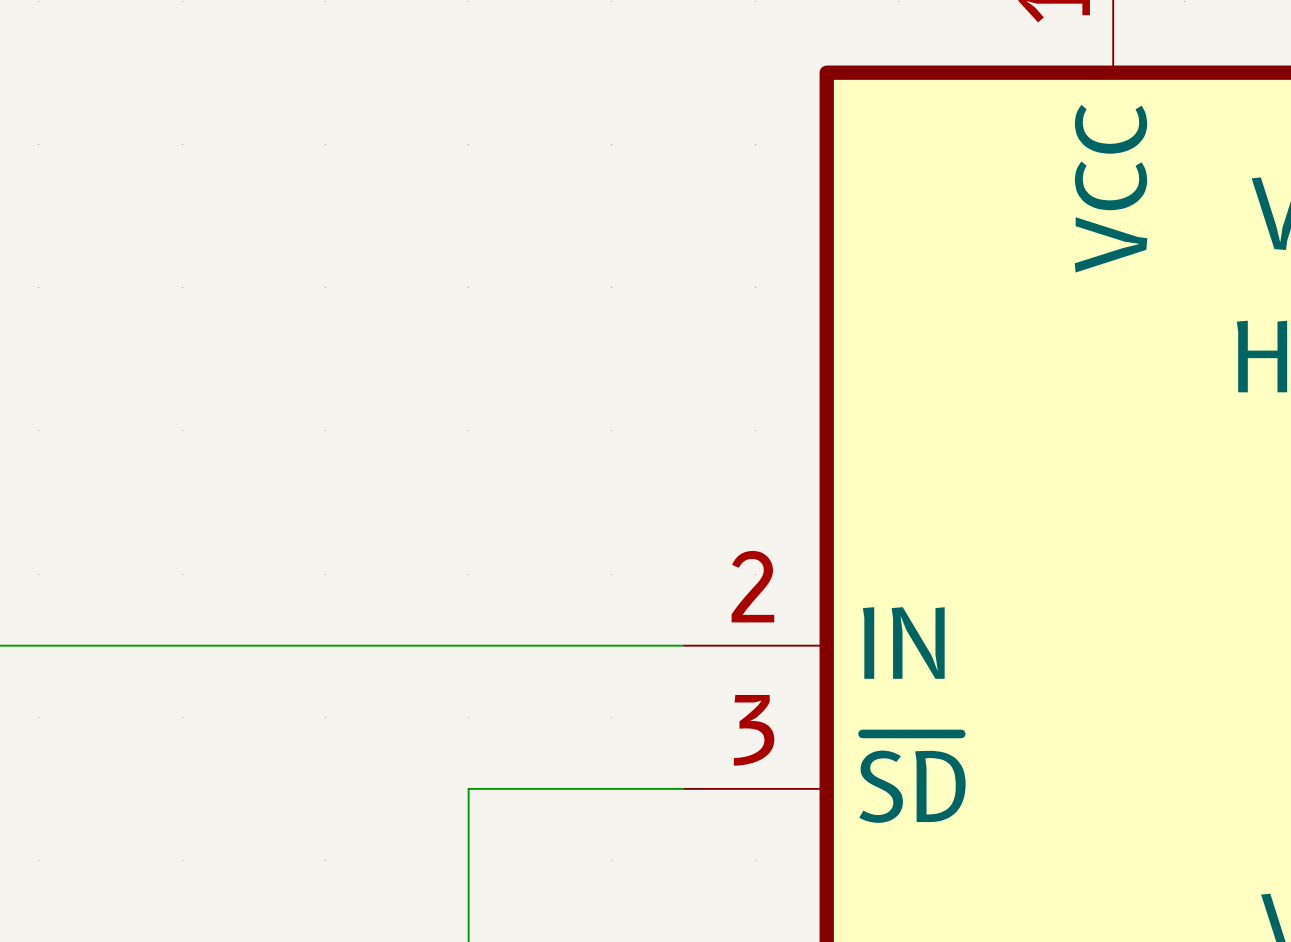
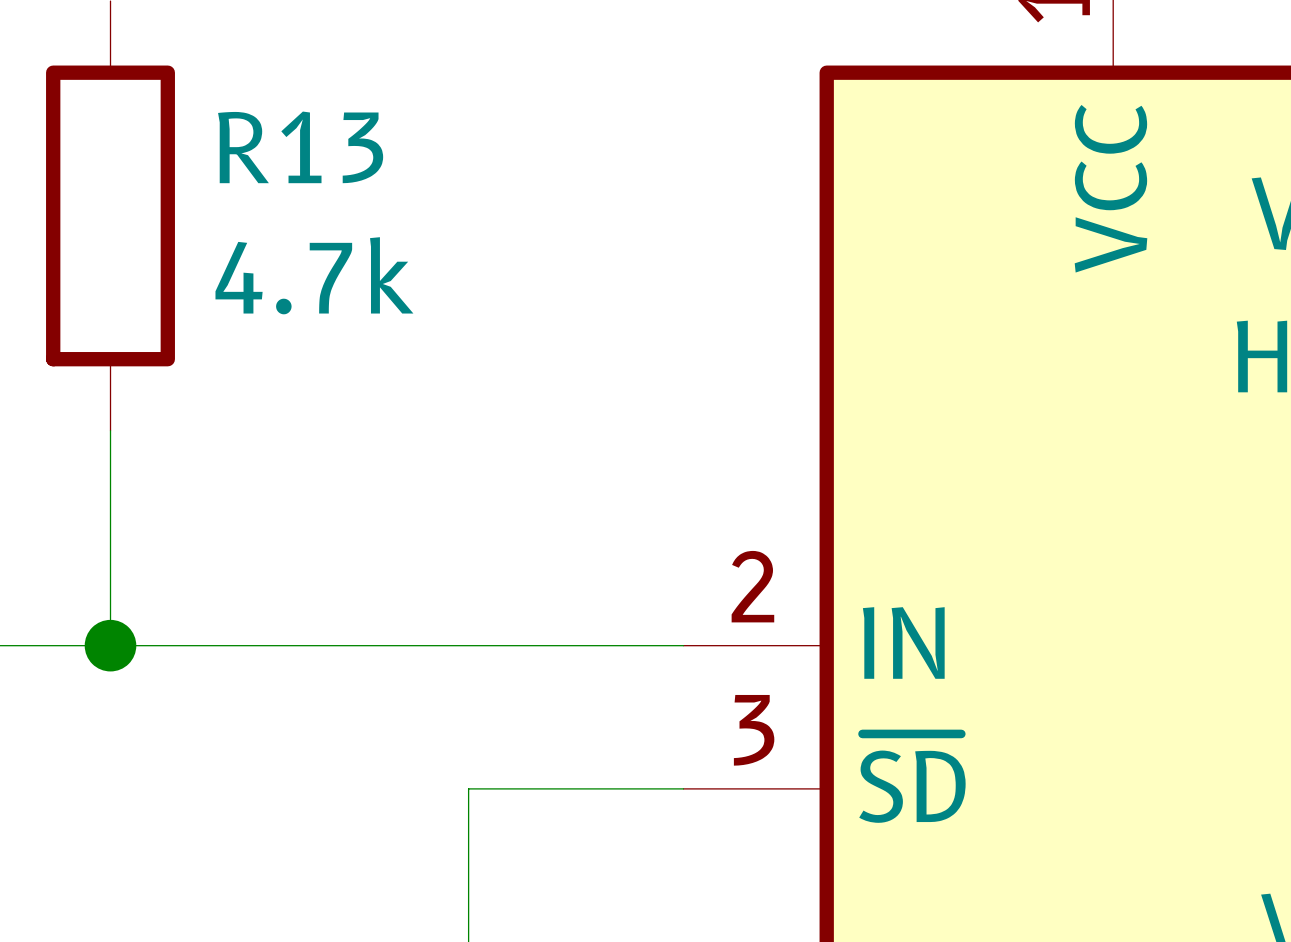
R13: none -> 4.7k (110, 215)
wire: none -> (110, 430) (110, 645)
junction: none -> (110, 645)

